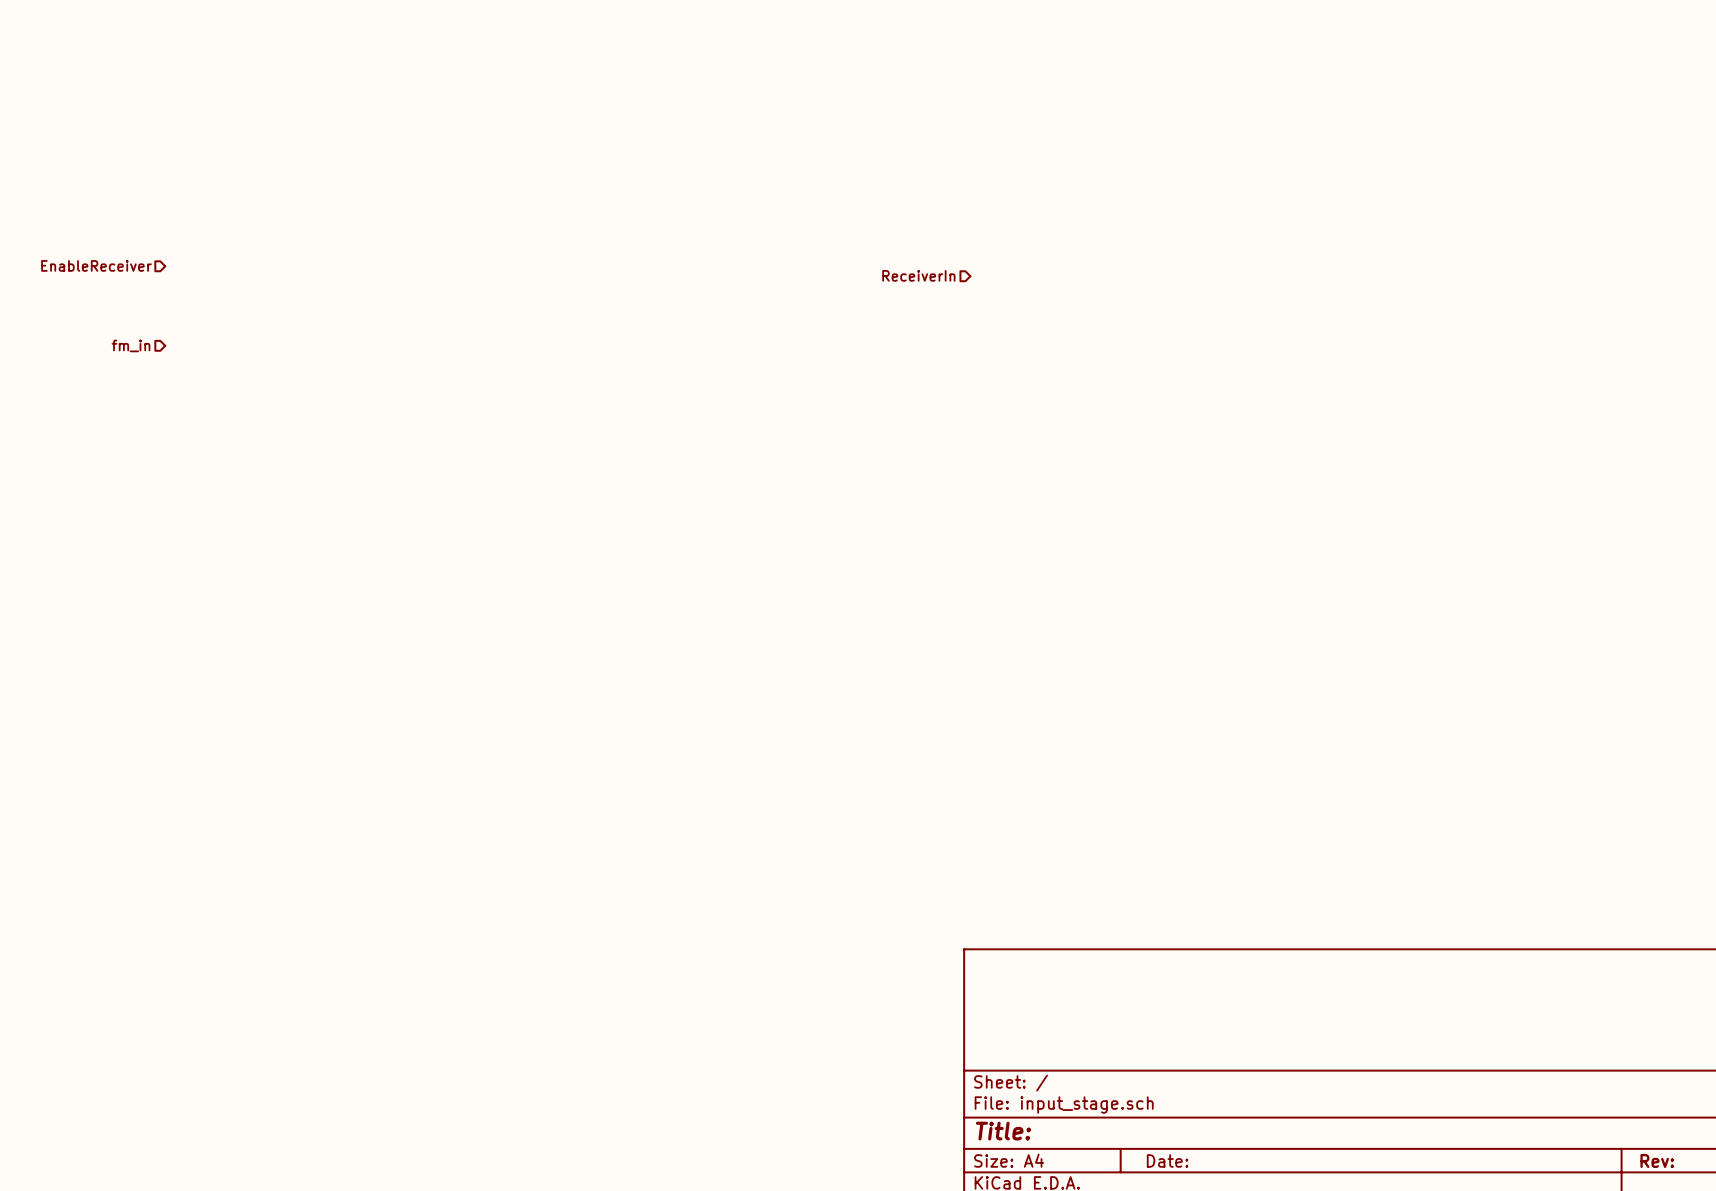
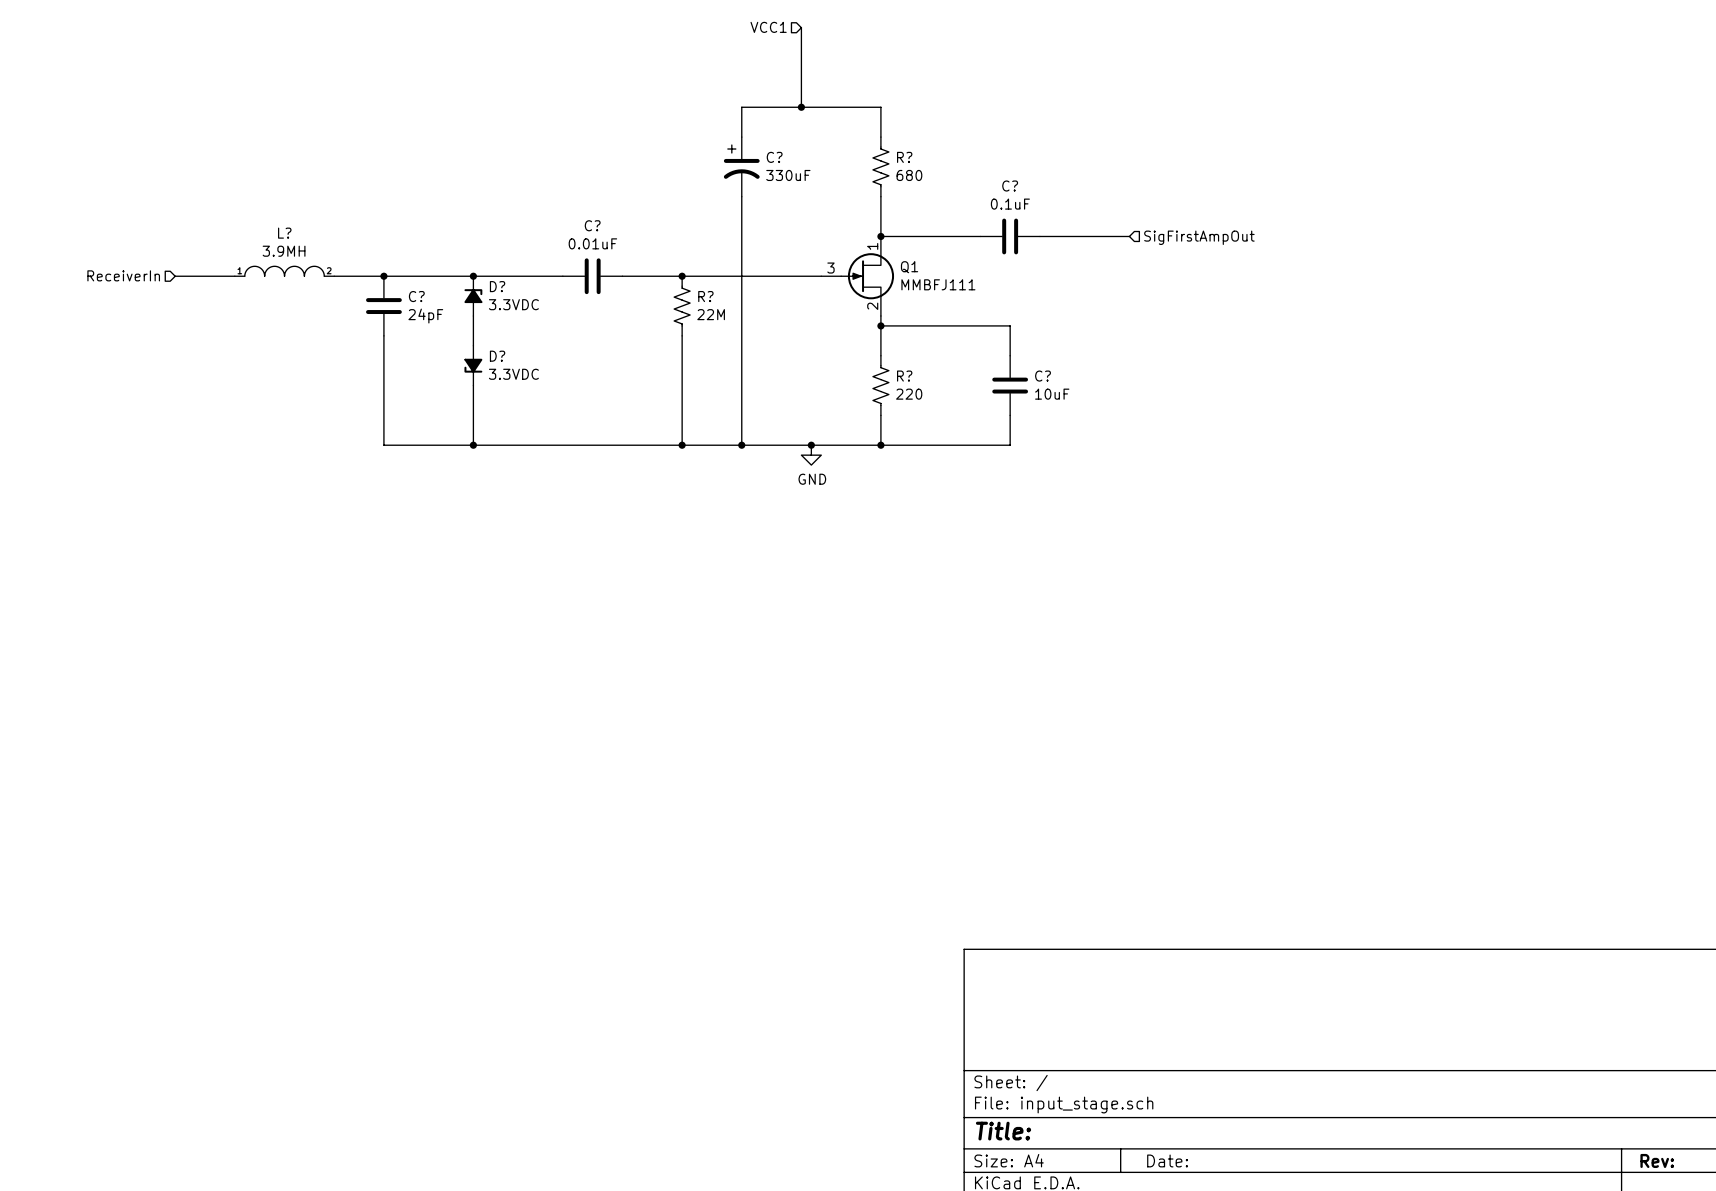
hierarchical label: none -> VCC1 (768, 27)
wire: none -> (801, 27) (801, 107)
junction: none -> (801, 107)
wire: none -> (741, 137) (741, 107) (880, 107) (880, 137)
C?: none -> 330uF (741, 166)
R?: none -> 680 (880, 166)
wire: none -> (741, 196) (741, 445)
wire: none -> (880, 196) (880, 236) (980, 236)
junction: none -> (880, 236)
C?: none -> 0.1uF (1010, 236)
wire: none -> (1039, 236) (1129, 236)
hierarchical label: none -> SigFirstAmpOut (1199, 237)
hierarchical label: EnableReceiver (96, 265) -> ReceiverIn (123, 275)
L?: none -> 3.9MH (284, 271)
hierarchical label: ReceiverIn (918, 275) -> none
wire: none -> (175, 276) (234, 276)
wire: none -> (334, 276) (562, 276)
junction: none -> (383, 276)
junction: none -> (473, 276)
C?: none -> 0.01uF (592, 276)
wire: none -> (622, 276) (821, 276)
junction: none -> (682, 276)
Q1: none -> MMBFJ111 (857, 276)
D?: none -> 3.3VDC (473, 296)
C?: none -> 24pF (383, 306)
R?: none -> 22M (682, 306)
wire: none -> (473, 316) (473, 345)
wire: none -> (880, 316) (880, 355)
wire: none -> (880, 325) (1010, 325) (1010, 355)
junction: none -> (880, 325)
wire: none -> (383, 335) (383, 445) (1010, 445) (1010, 415)
wire: none -> (682, 335) (682, 445)
hierarchical label: fm_in (131, 345) -> none
D?: none -> 3.3VDC (473, 365)
wire: none -> (473, 385) (473, 445)
R?: none -> 220 (880, 385)
C?: none -> 10uF (1010, 385)
wire: none -> (880, 415) (880, 445)
junction: none -> (473, 445)
junction: none -> (682, 445)
junction: none -> (741, 445)
junction: none -> (811, 445)
junction: none -> (880, 445)
power symbol: none -> GND (811, 455)

